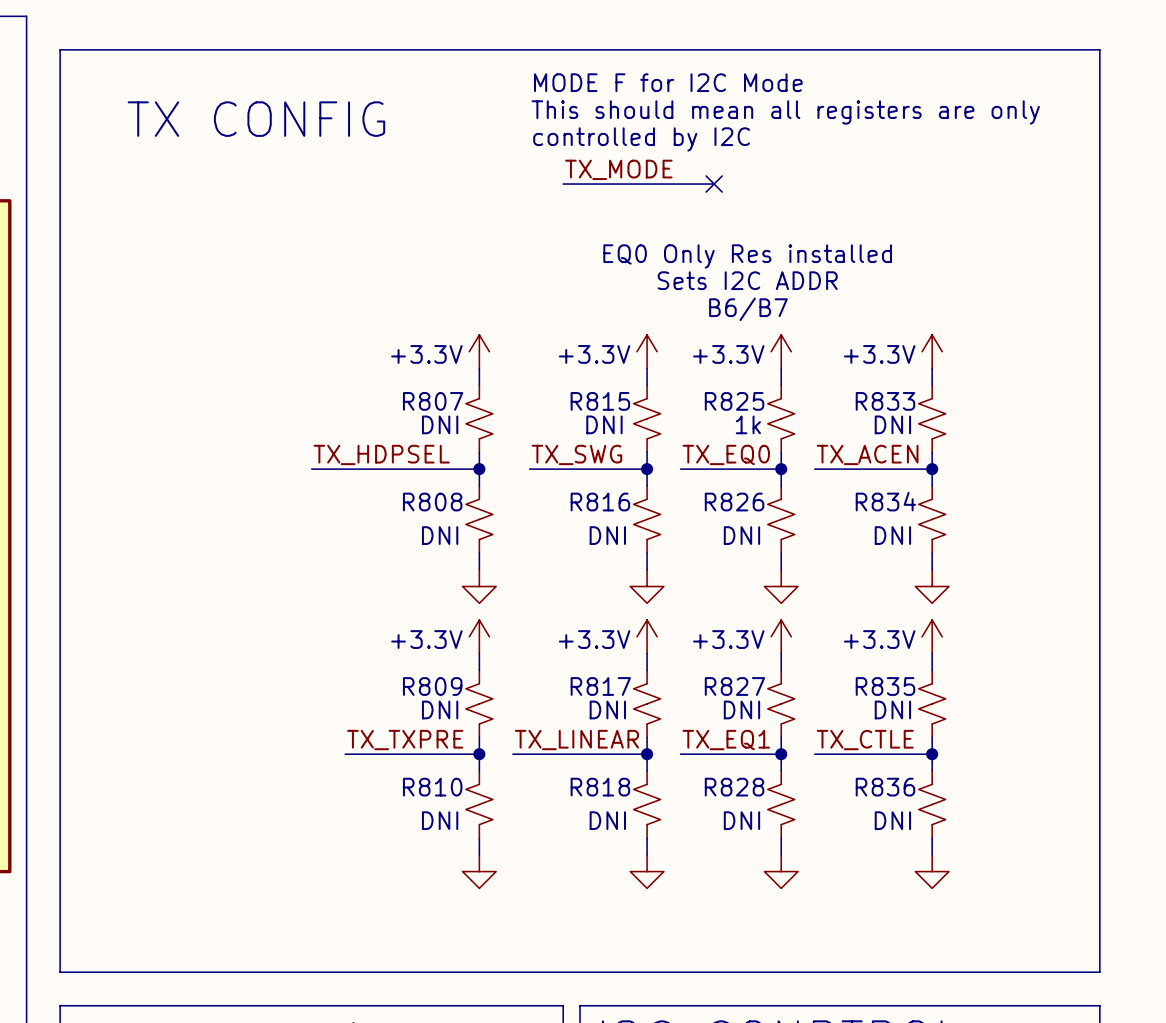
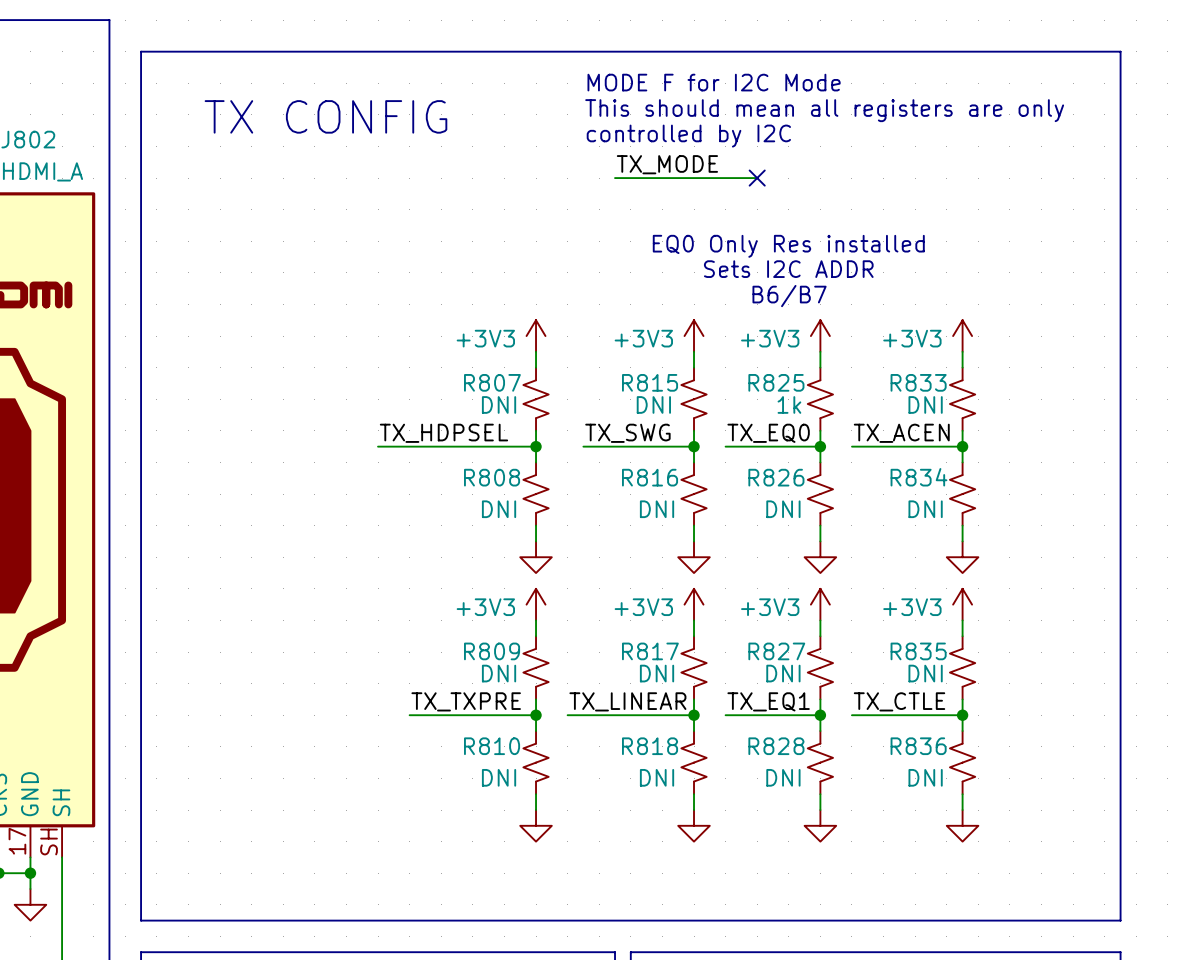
power symbol: +3.3V (479, 351) -> +3V3 (536, 336)
power symbol: +3.3V (647, 351) -> +3V3 (694, 336)
power symbol: +3.3V (781, 351) -> +3V3 (820, 336)
power symbol: +3.3V (932, 351) -> +3V3 (962, 336)
power symbol: +3.3V (479, 636) -> +3V3 (536, 604)
power symbol: +3.3V (647, 636) -> +3V3 (694, 604)
power symbol: +3.3V (781, 636) -> +3V3 (820, 604)
power symbol: +3.3V (932, 636) -> +3V3 (962, 604)

